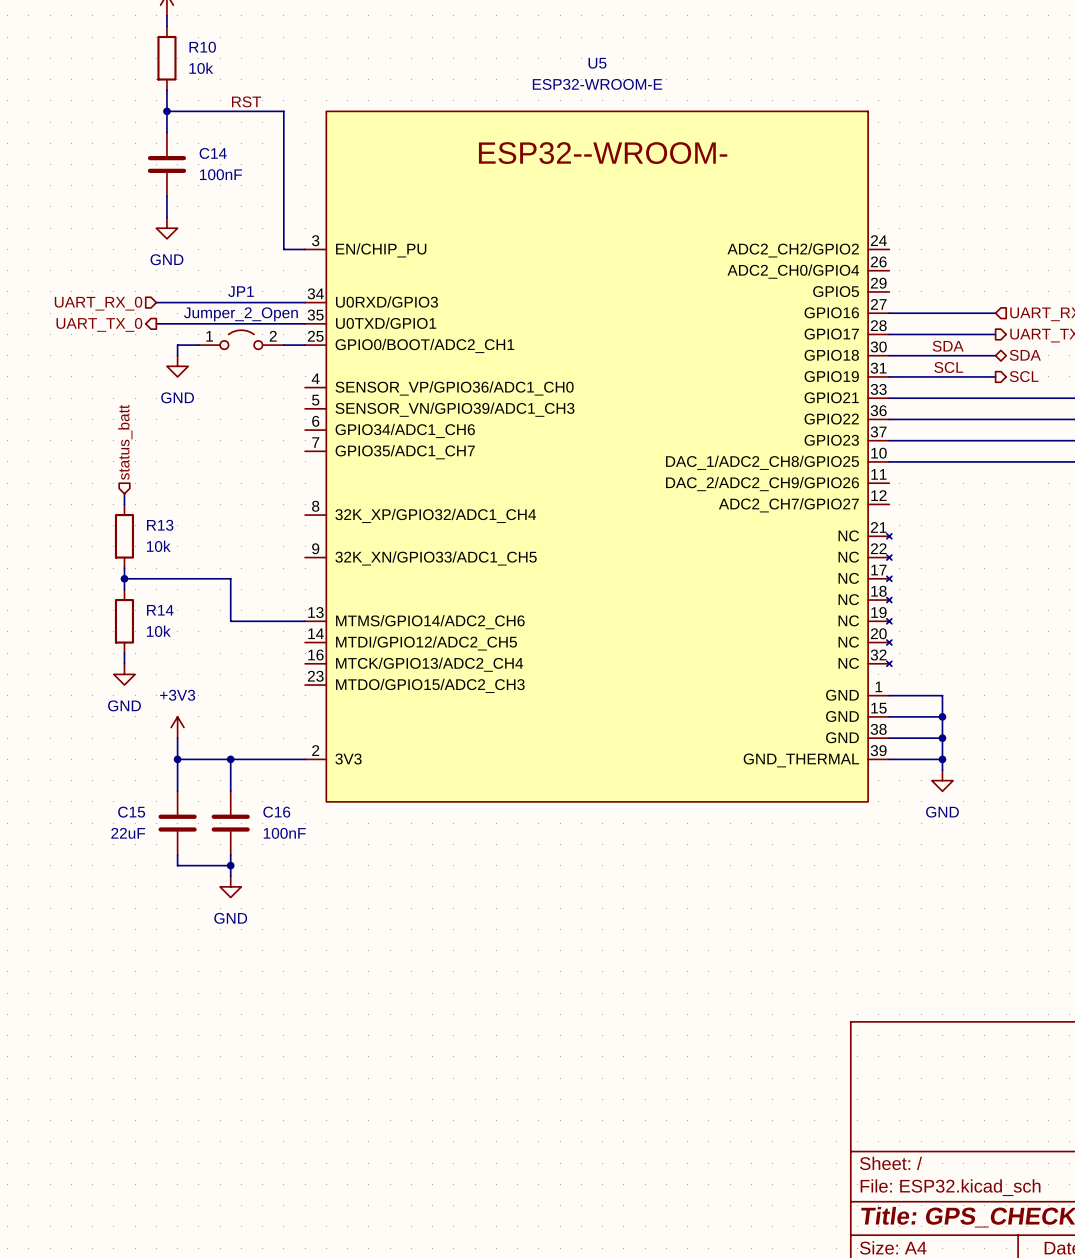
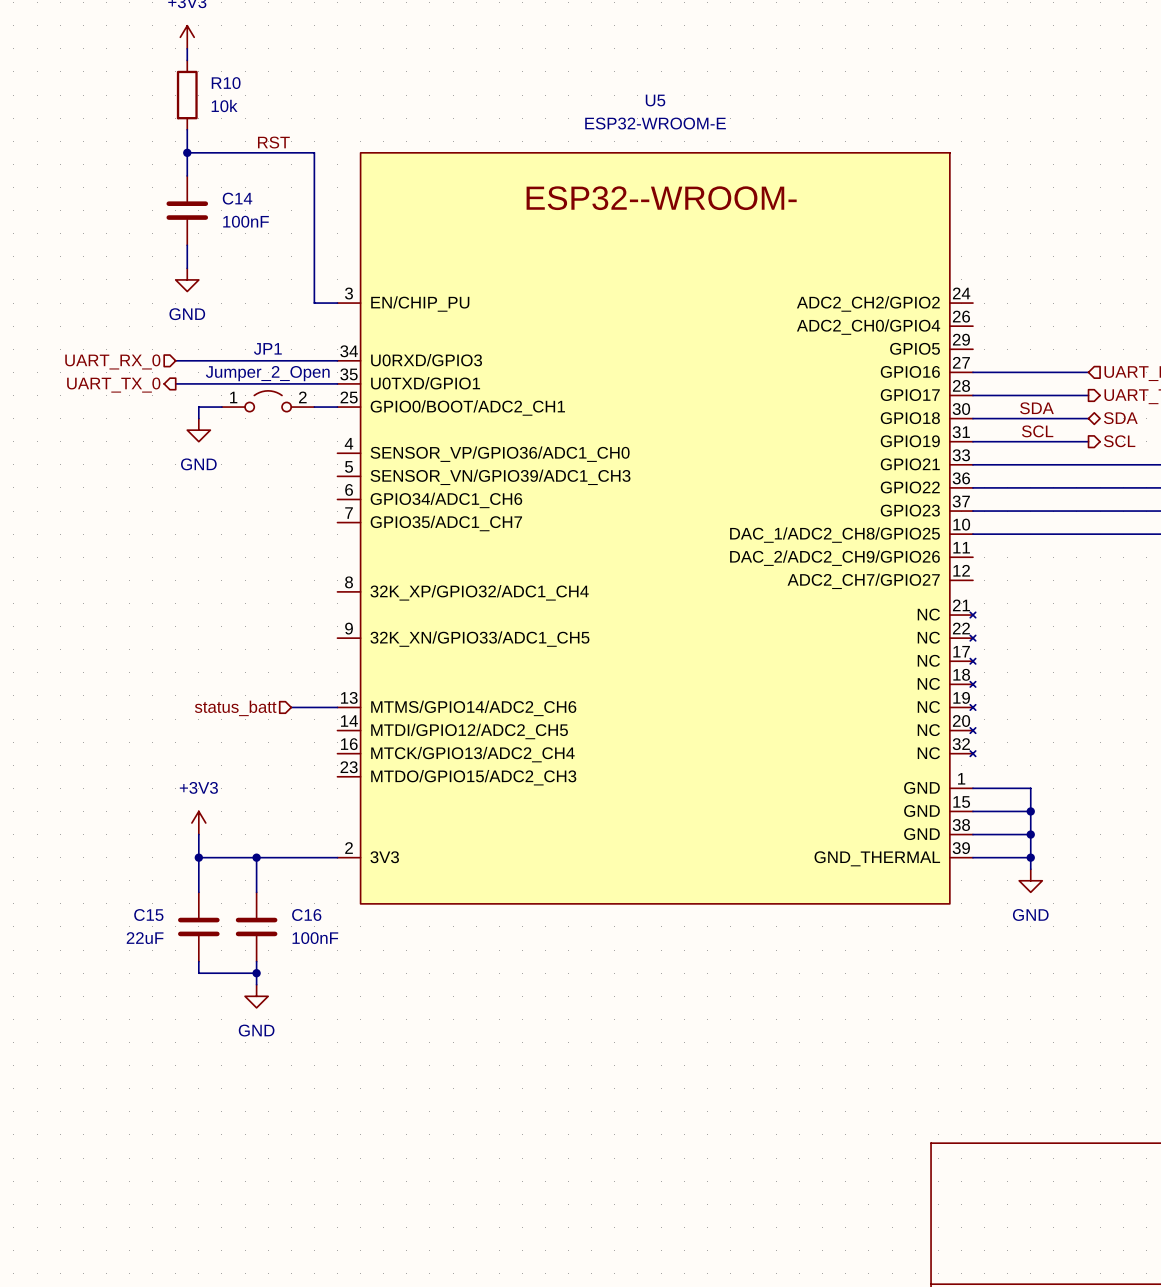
hierarchical label rotation: 0° (125, 442) -> 90° counterclockwise (235, 708)
hierarchical label position: status_batt (125, 442) -> status_batt (235, 708)
wire: (124, 493) (124, 504) -> none
R13: 10k (124, 536) -> none
wire: (124, 568) (124, 589) -> none
wire: (124, 578) (230, 578) (230, 621) (262, 621) -> none
junction: (124, 578) -> none
R14: 10k (124, 621) -> none
wire: (124, 653) (124, 663) -> none
power symbol: GND (124, 674) -> none

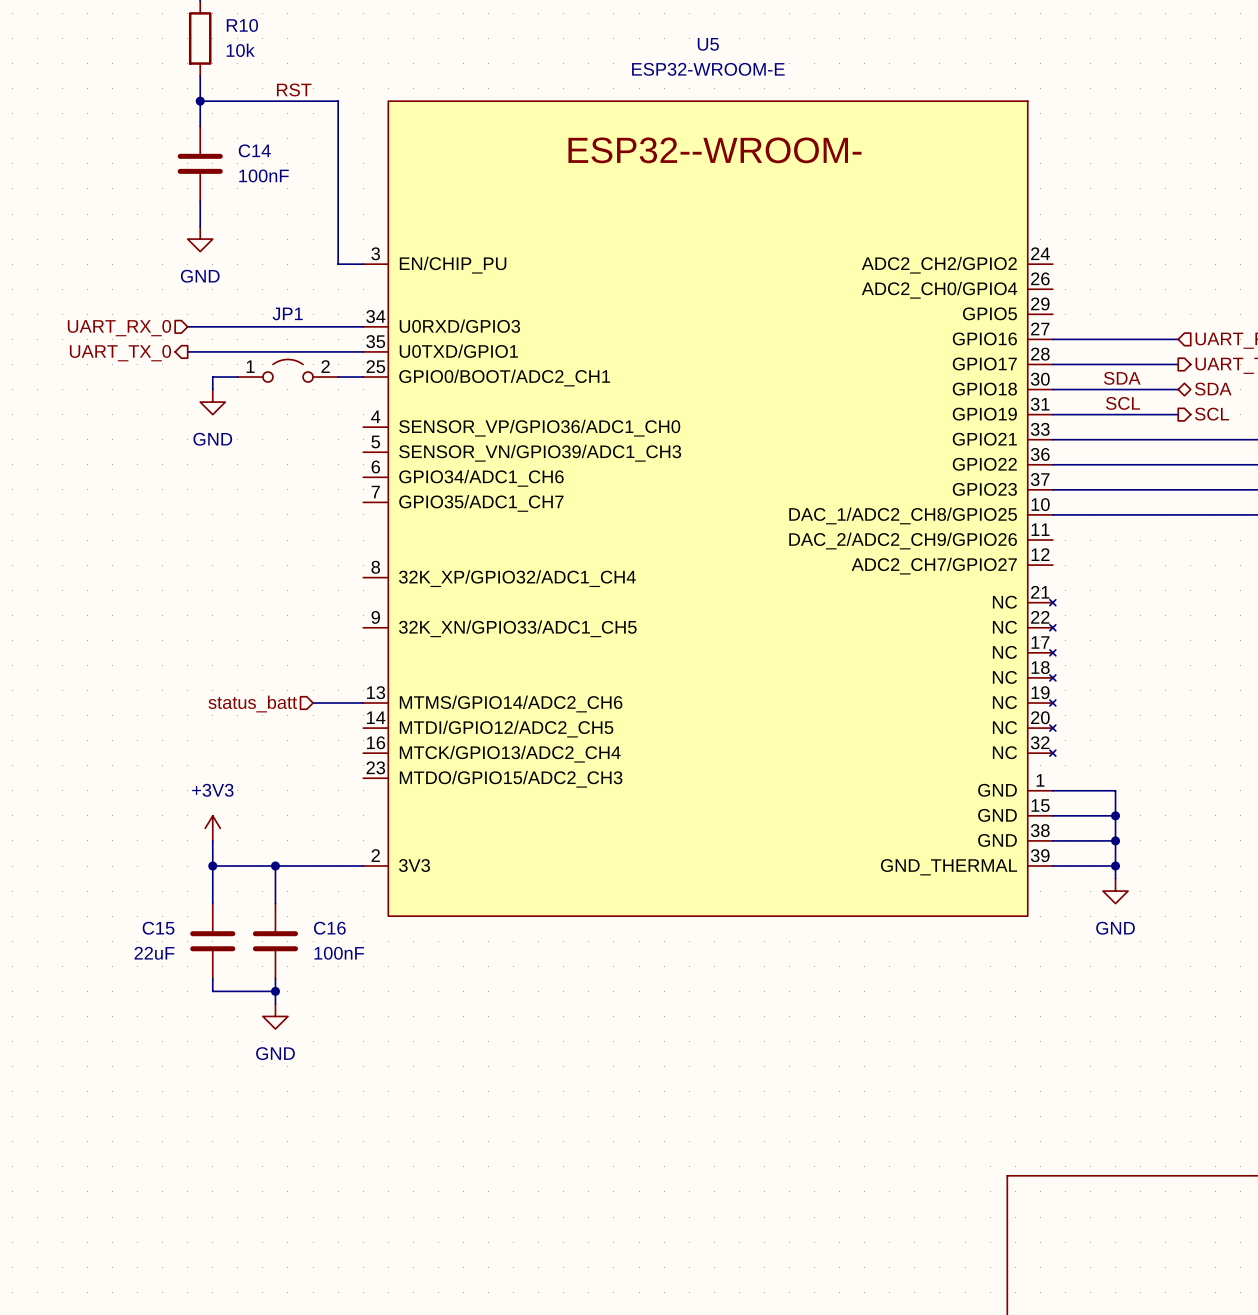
JP1 value: Jumper_2_Open (267, 373) -> none

